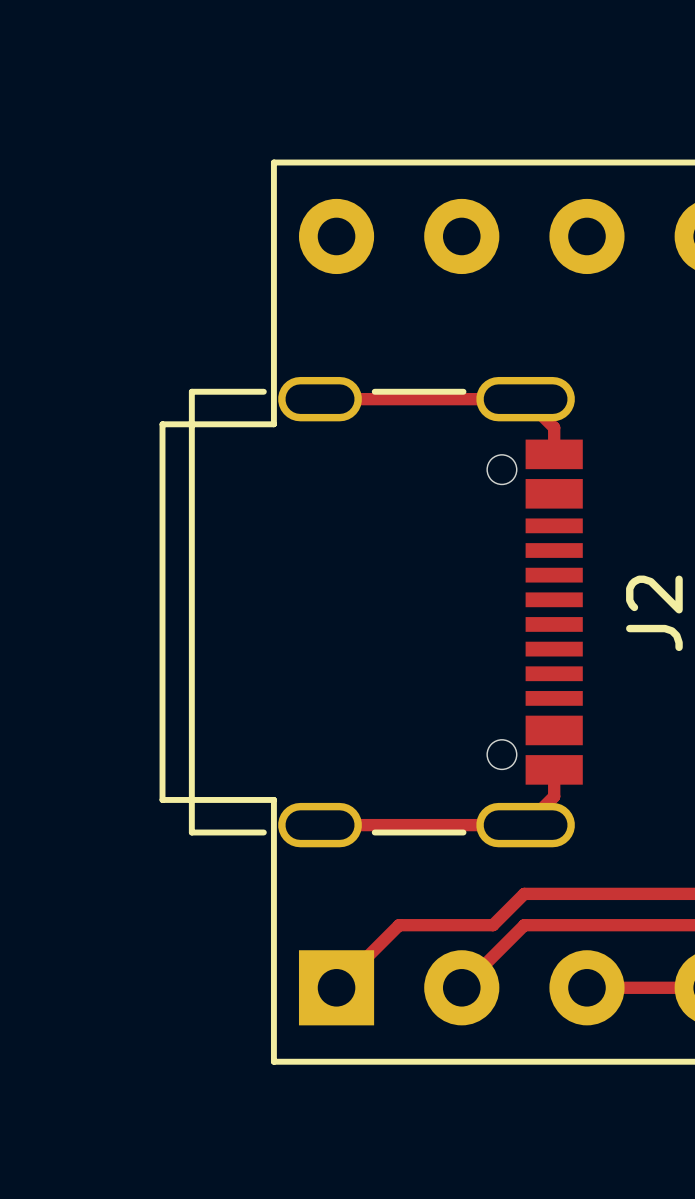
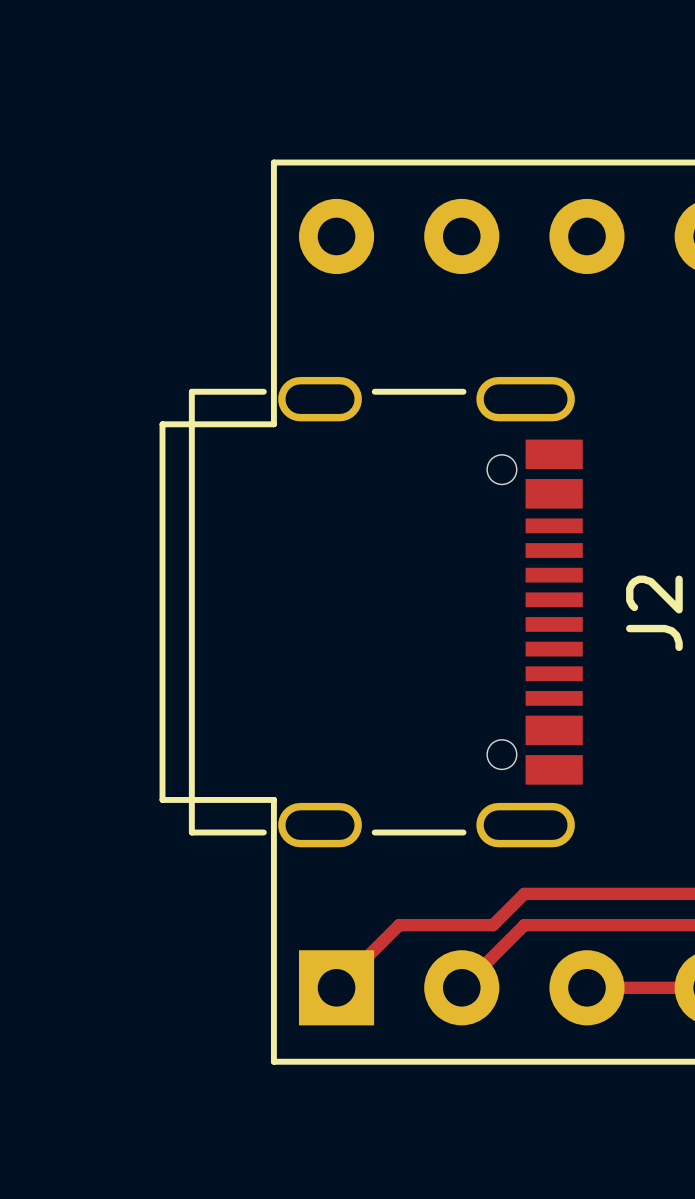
track: (320, 399) (525, 399) (554, 427) (554, 454) -> none
track: (554, 769) (554, 796) (525, 825) (320, 825) -> none

